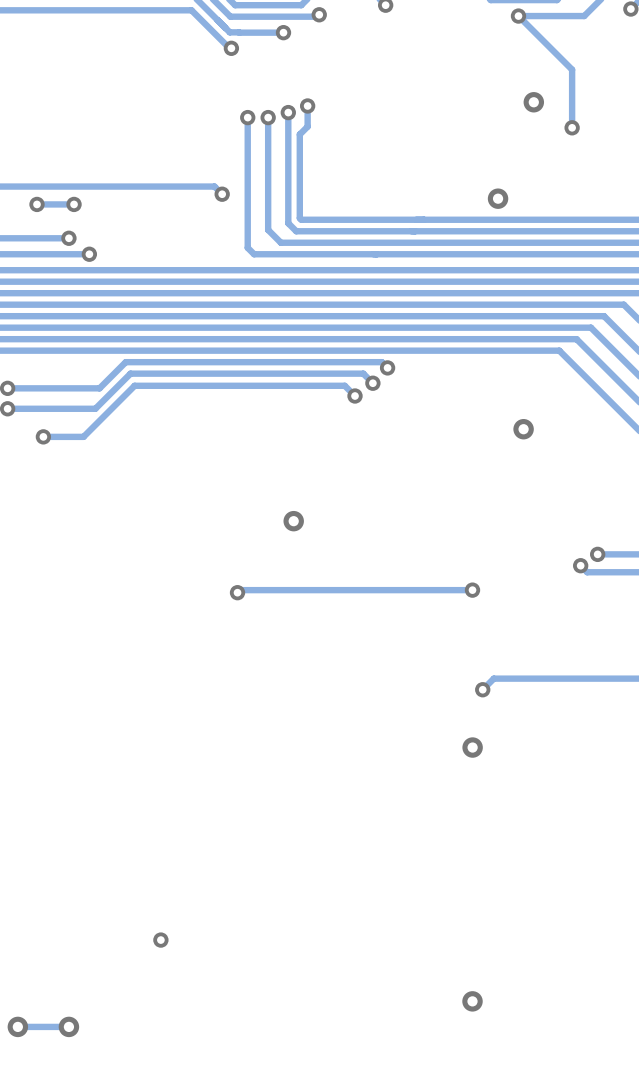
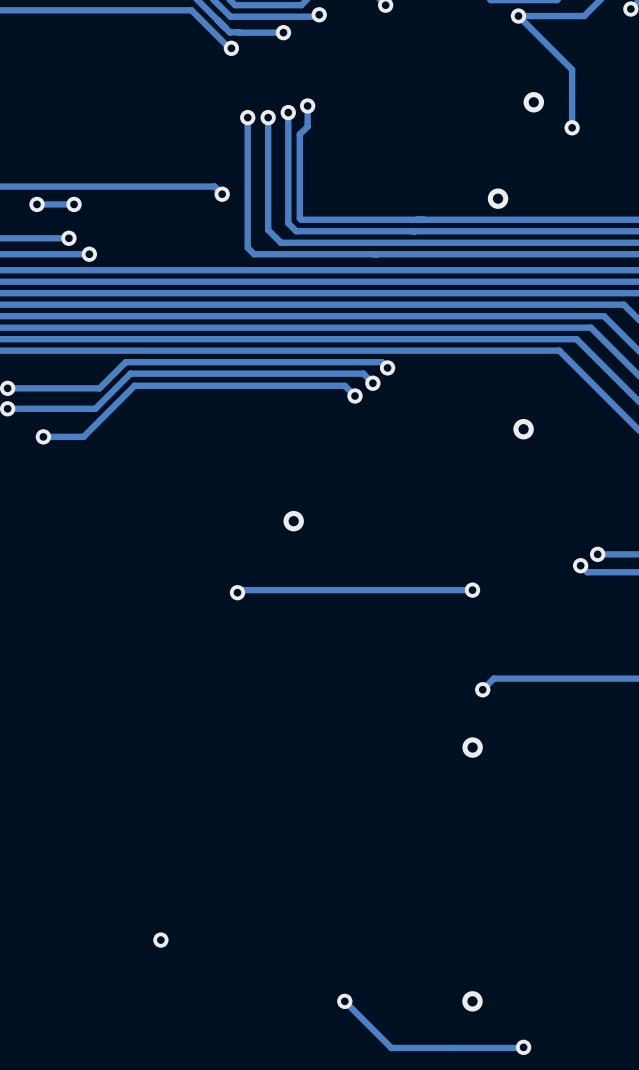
track: none -> (344, 1001) (391, 1047) (523, 1047)
via: none -> (344, 1001)
via: (17, 1026) -> none
track: (68, 1026) (17, 1026) -> none
via: (68, 1026) -> none
via: none -> (523, 1047)

